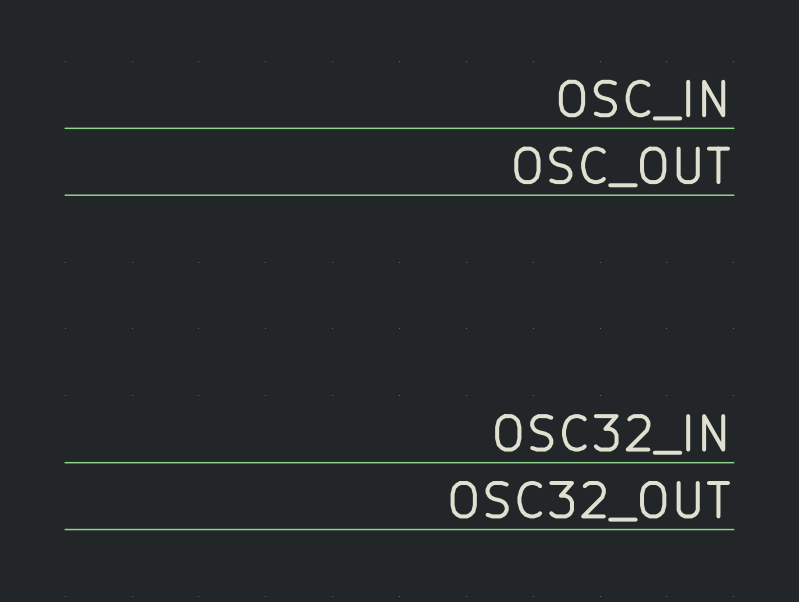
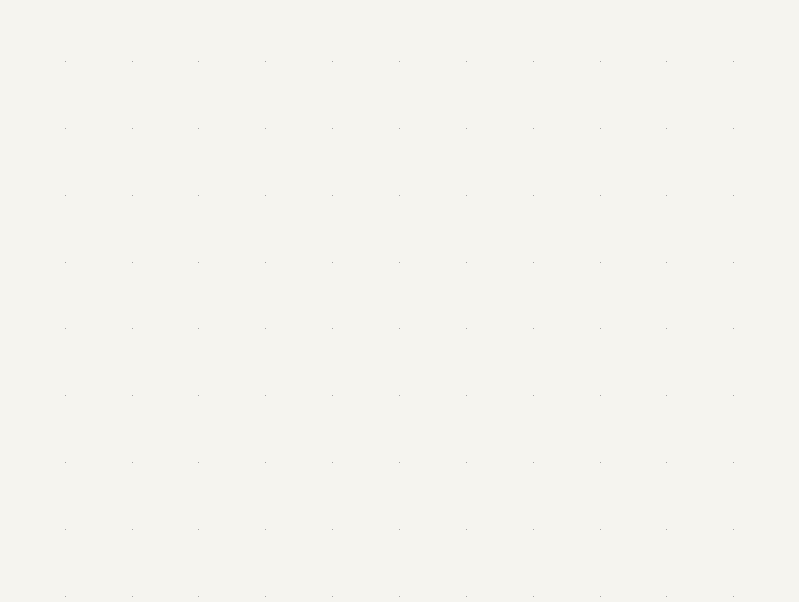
label: OSC_IN (642, 100) -> none
wire: (65, 128) (733, 128) -> none
label: OSC_OUT (622, 166) -> none
wire: (65, 195) (733, 195) -> none
label: OSC32_IN (610, 434) -> none
wire: (65, 462) (733, 462) -> none
label: OSC32_OUT (590, 501) -> none
wire: (65, 529) (733, 529) -> none

